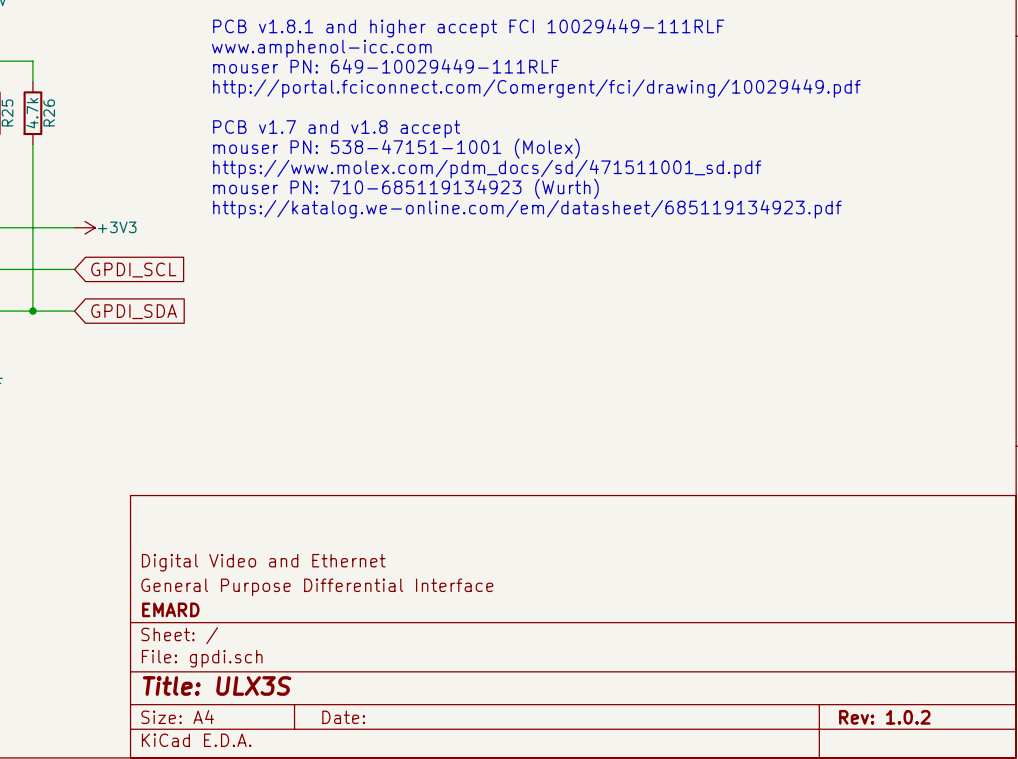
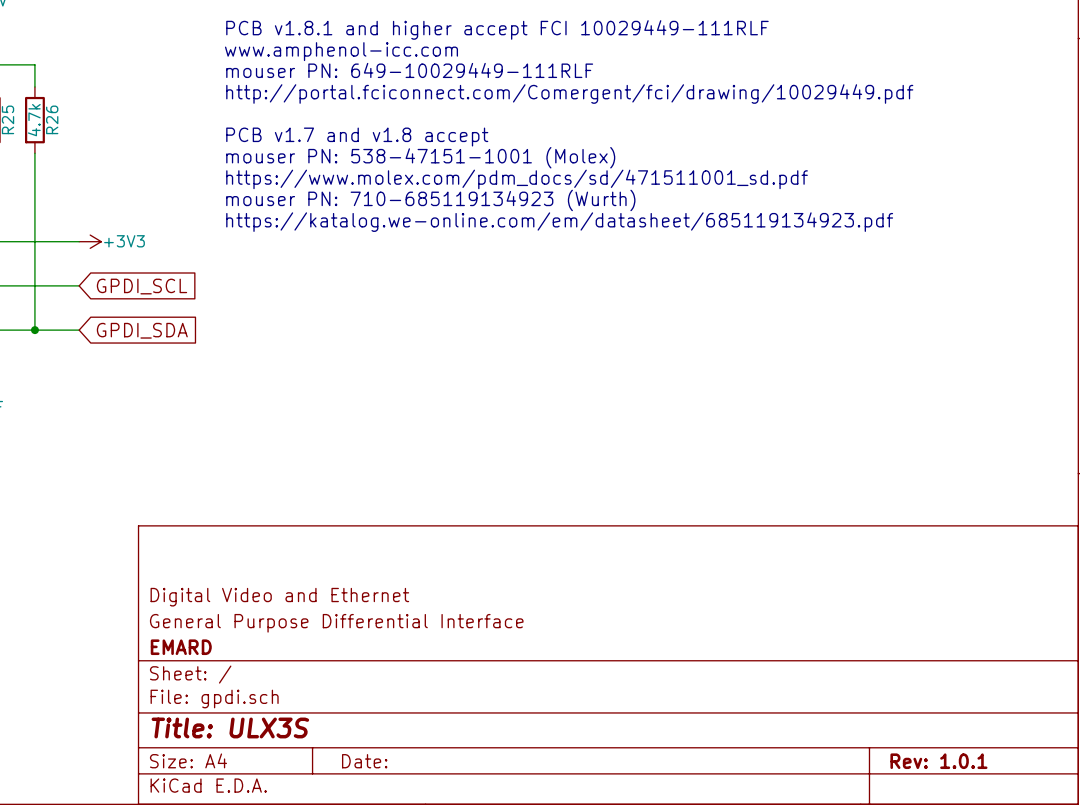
title block: Rev: 1.0.2 (884, 717) -> Rev: 1.0.1 (938, 761)

